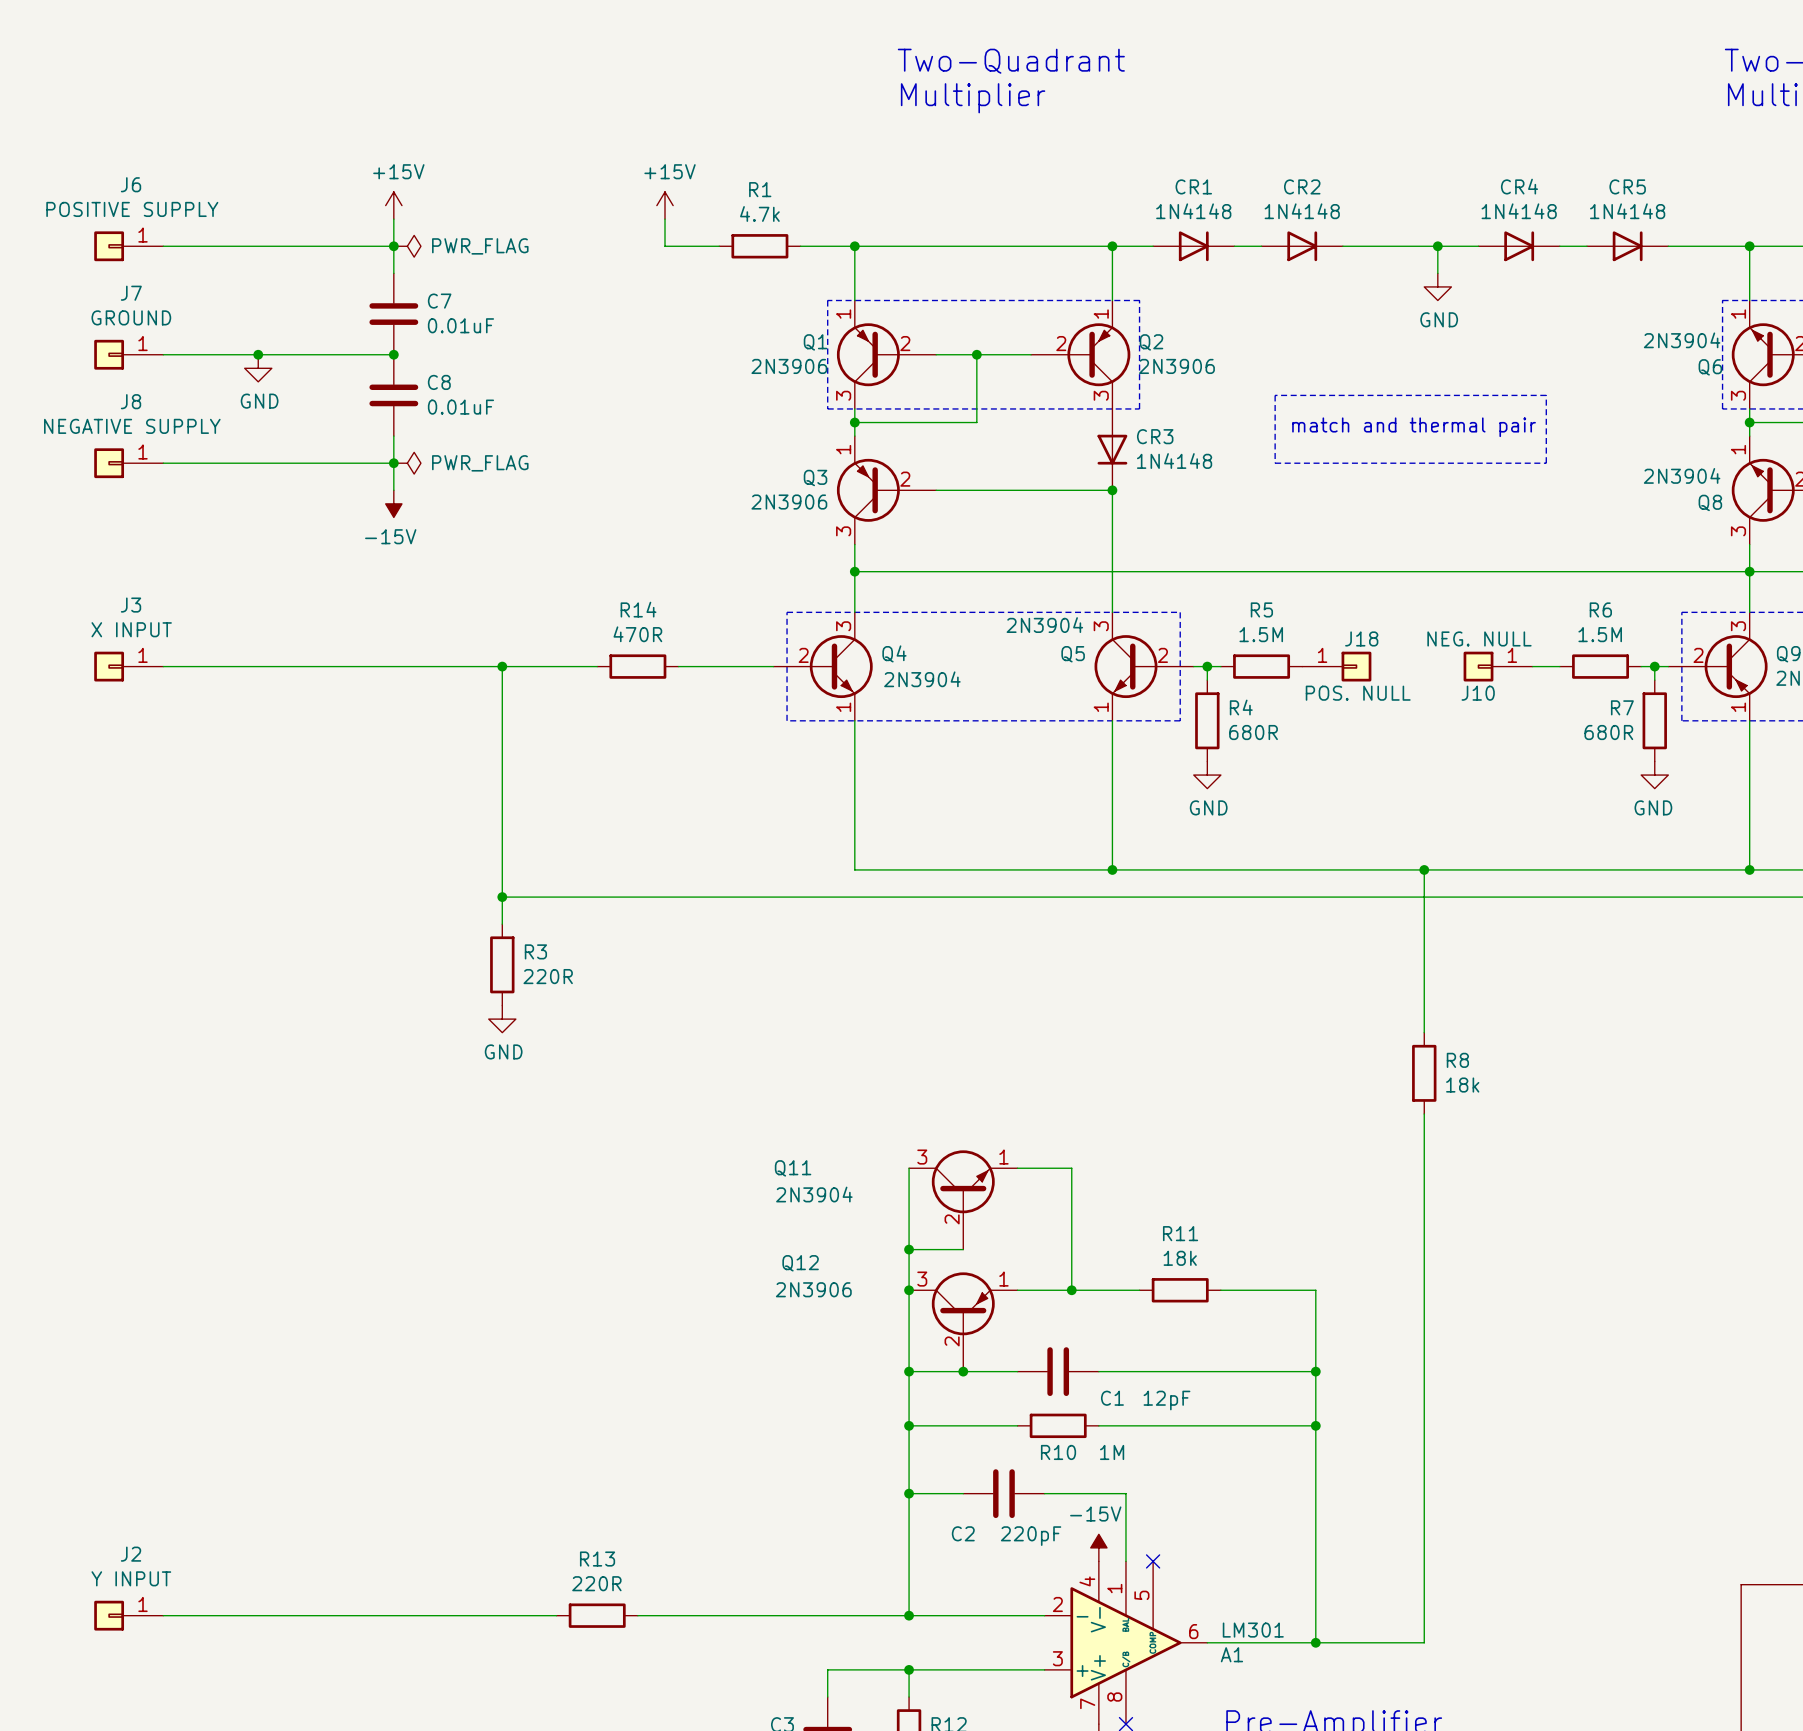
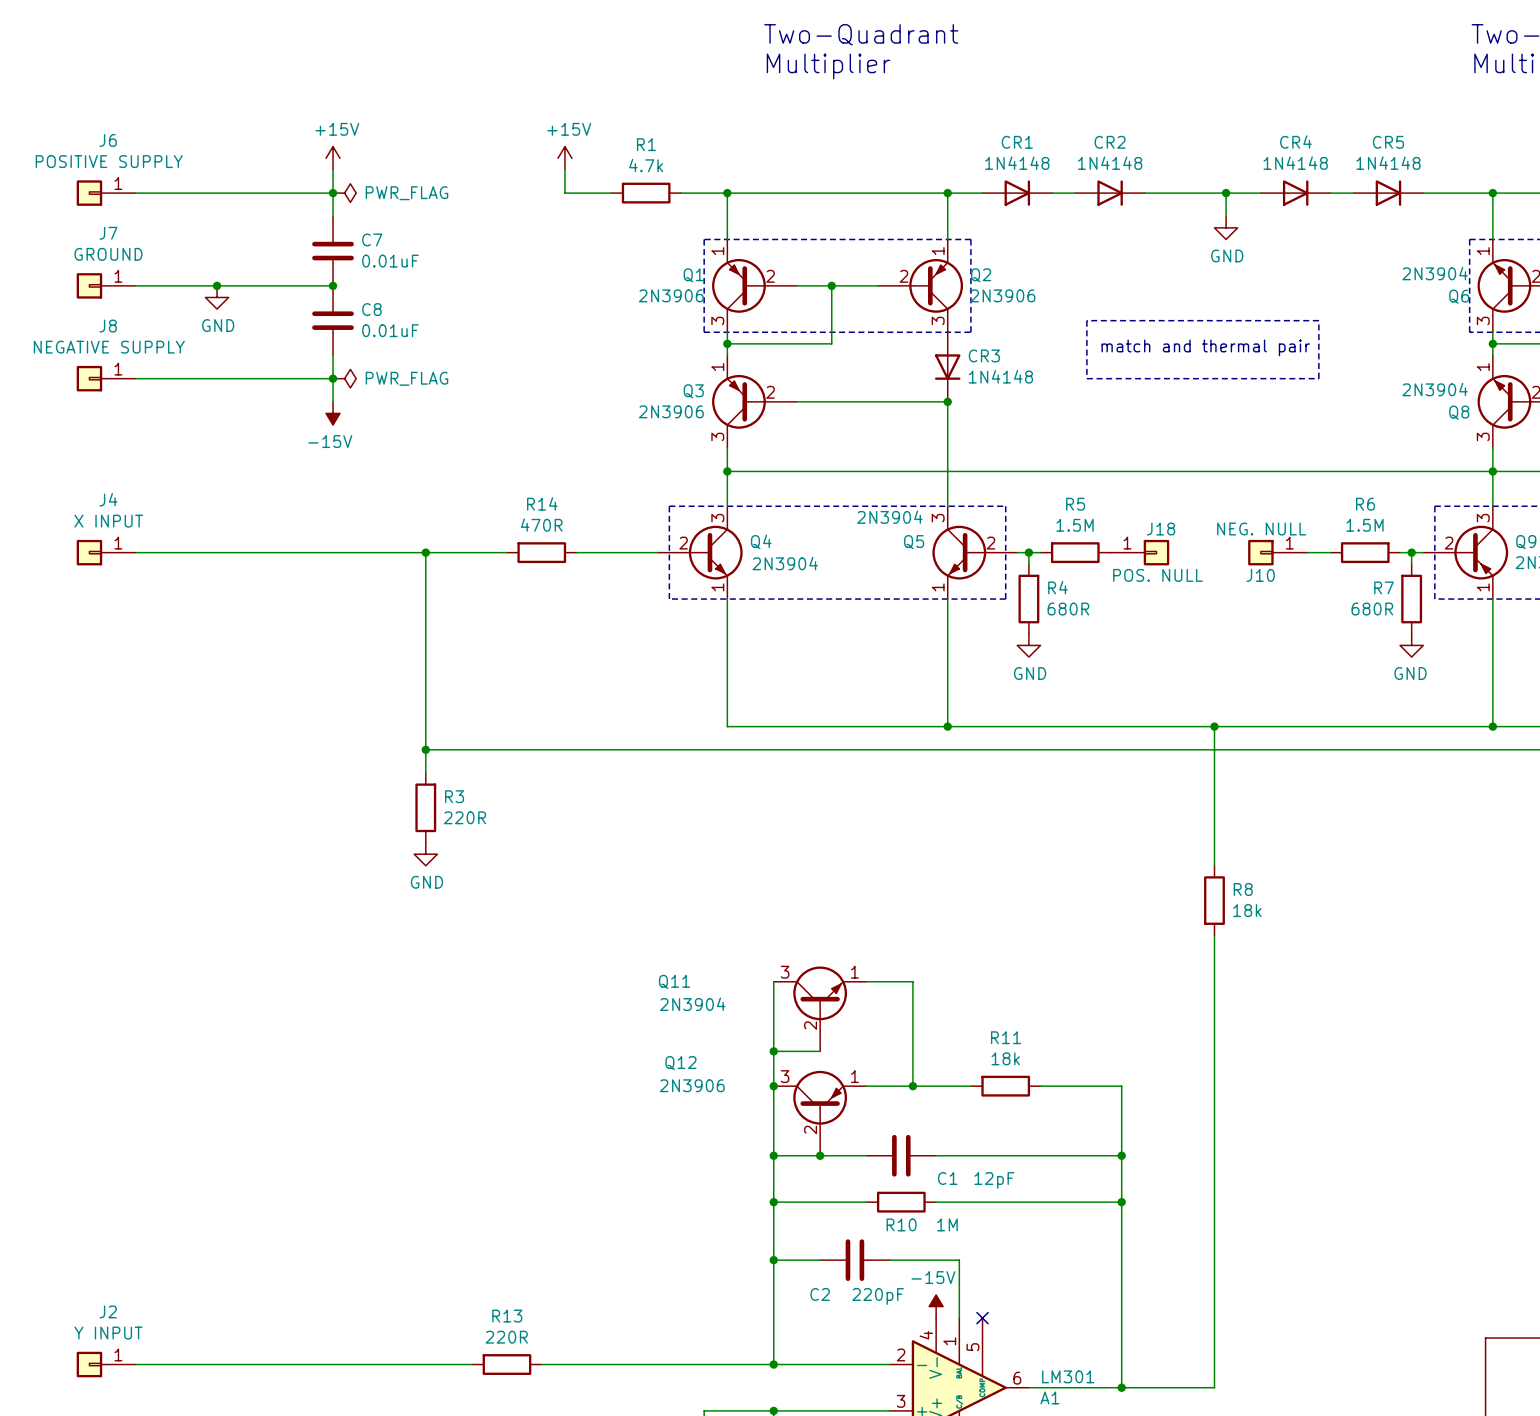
J3 name: J3 (131, 605) -> J4 (108, 499)

